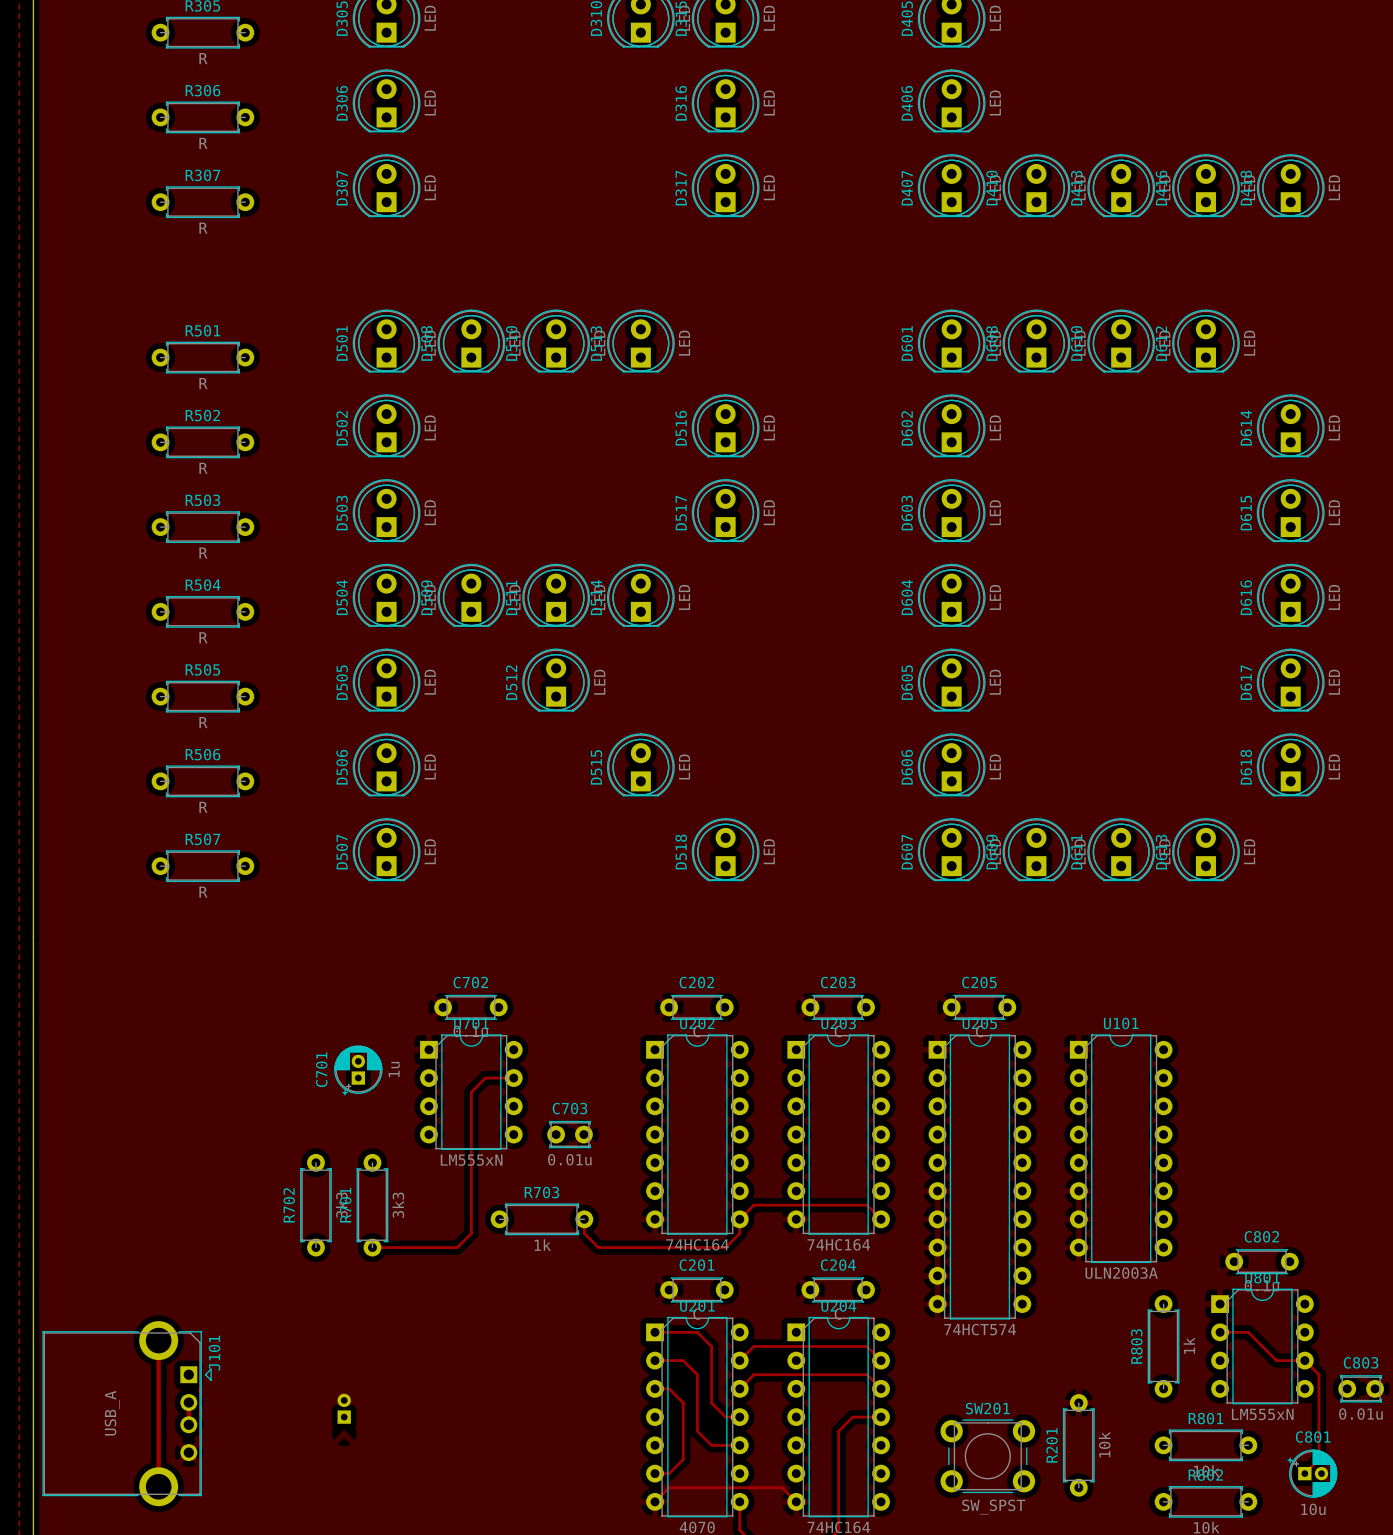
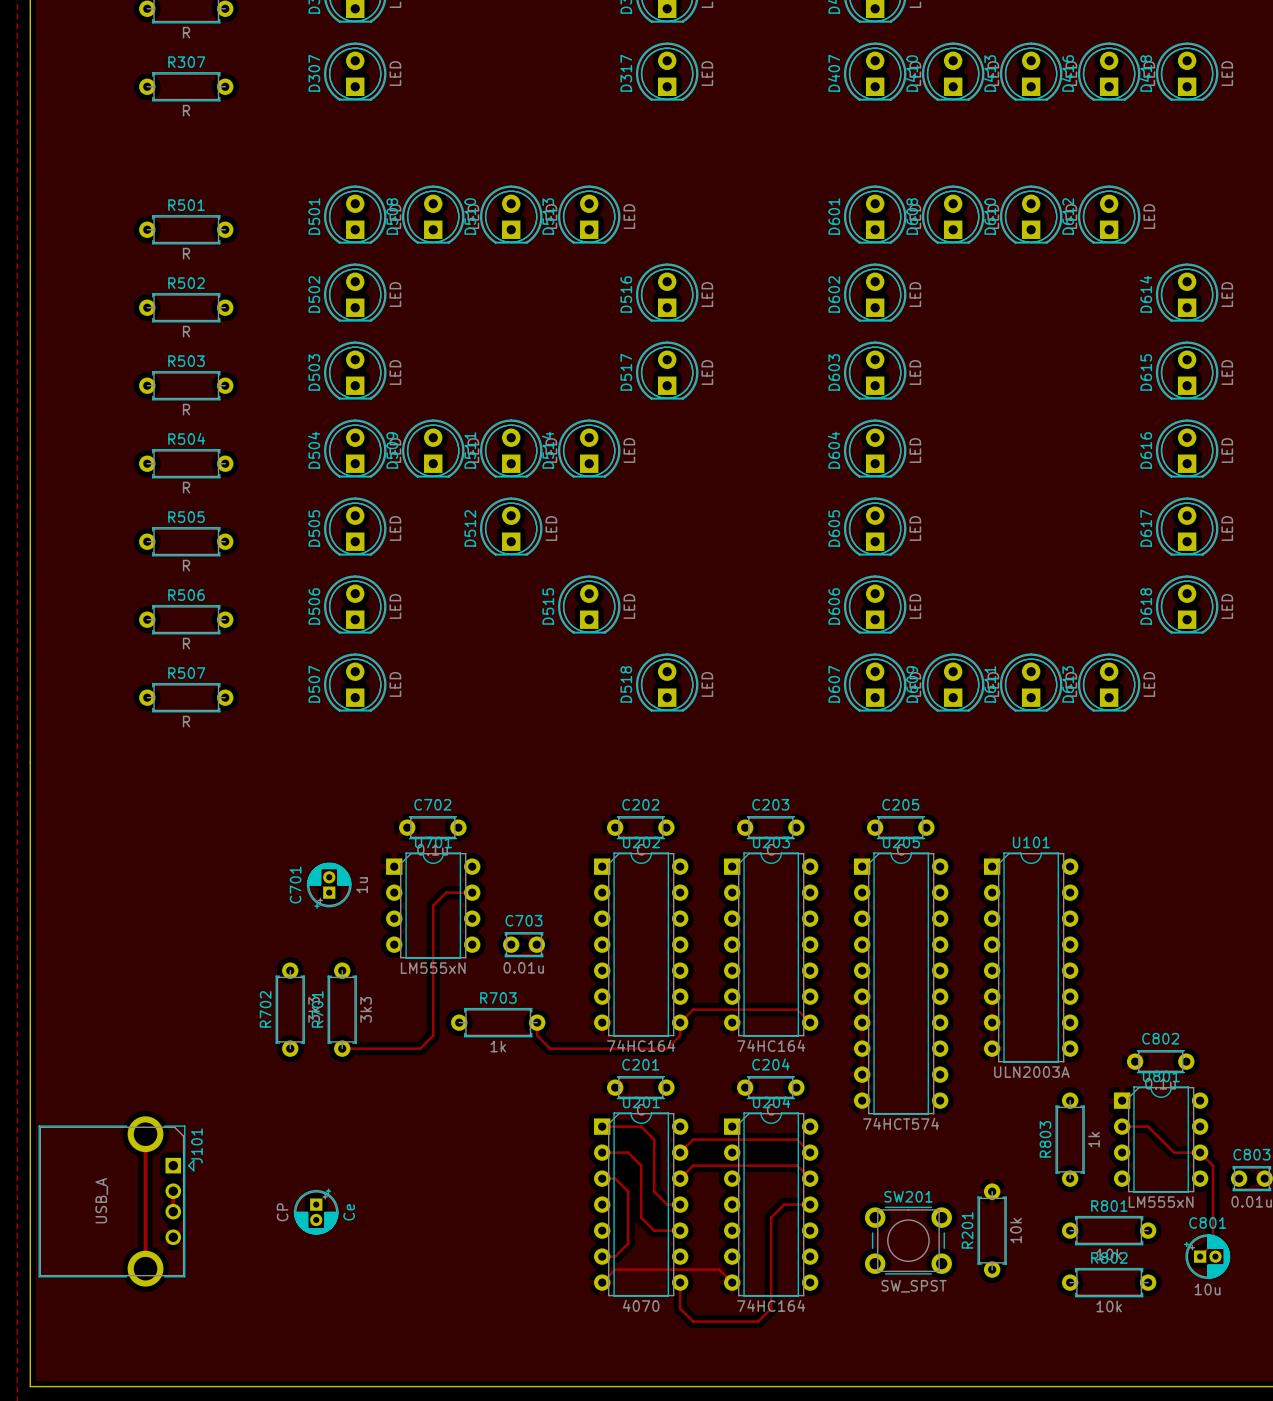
Ce side: bottom (344, 1408) -> top (316, 1211)

